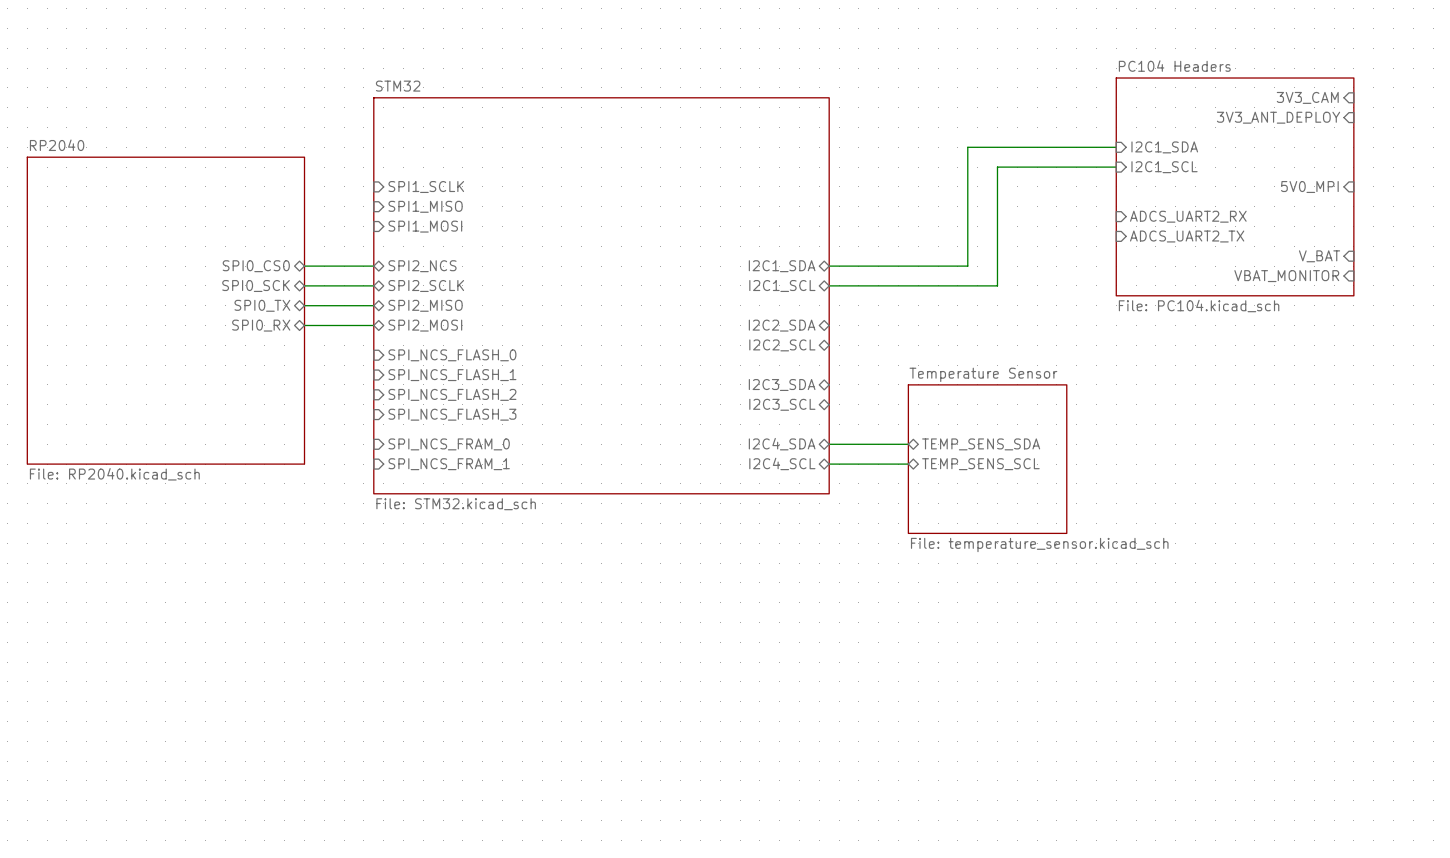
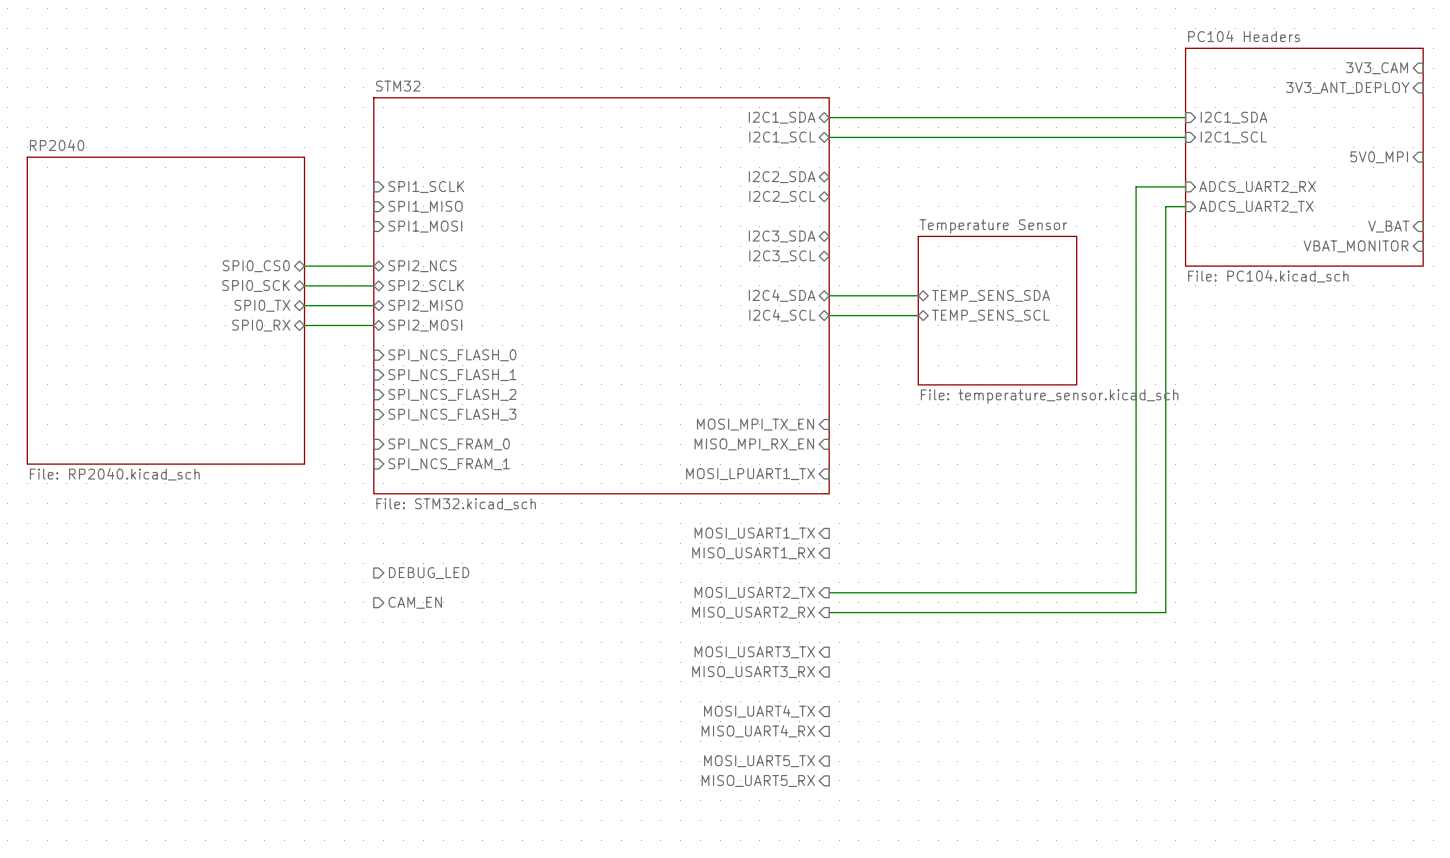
sheet pin position: 3V3_CAM (1307, 97) -> 3V3_CAM (1377, 68)
wire: none -> (829, 117) (1185, 117)
sheet pin position: 3V3_ANT_DEPLOY (1278, 117) -> 3V3_ANT_DEPLOY (1347, 88)
wire: none -> (829, 137) (1185, 137)
wire: (1116, 147) (967, 147) (967, 266) (829, 266) -> none
sheet pin position: I2C1_SDA (1164, 147) -> I2C1_SDA (1234, 117)
wire: (1116, 167) (997, 167) (997, 285) (829, 285) -> none
sheet pin position: I2C1_SCL (1164, 167) -> I2C1_SCL (1233, 137)
wire: none -> (1185, 186) (1136, 186) (1136, 592) (829, 592)
sheet PC104 Headers position: (1235, 186) -> (1304, 157)
sheet pin position: 5V0_MPI (1309, 187) -> 5V0_MPI (1379, 157)
wire: none -> (1185, 206) (1165, 206) (1165, 612) (829, 612)
sheet pin position: ADCS_UART2_RX (1188, 216) -> ADCS_UART2_RX (1257, 187)
sheet pin position: ADCS_UART2_TX (1187, 236) -> ADCS_UART2_TX (1256, 206)
sheet pin position: V_BAT (1319, 256) -> V_BAT (1388, 226)
sheet pin position: I2C1_SDA (782, 266) -> I2C1_SDA (782, 117)
sheet pin position: VBAT_MONITOR (1286, 276) -> VBAT_MONITOR (1356, 246)
sheet pin position: I2C1_SCL (782, 286) -> I2C1_SCL (782, 137)
sheet pin: none -> I2C4_SDA (782, 295)
wire: none -> (829, 295) (918, 295)
wire: none -> (829, 315) (918, 315)
sheet pin position: I2C2_SDA (782, 325) -> I2C2_SDA (782, 177)
sheet pin position: I2C2_SCL (782, 345) -> I2C2_SCL (782, 196)
sheet pin position: I2C3_SDA (782, 384) -> I2C3_SDA (782, 236)
sheet pin position: I2C3_SCL (782, 404) -> I2C3_SCL (782, 256)
sheet pin: none -> MOSI_MPI_TX_EN (755, 424)
sheet pin shape: bidirectional (782, 444) -> input (754, 444)
sheet pin: I2C4_SDA (782, 444) -> MISO_MPI_RX_EN (754, 444)
wire: (829, 444) (908, 444) -> none
sheet pin position: TEMP_SENS_SDA (981, 444) -> TEMP_SENS_SDA (991, 295)
sheet Temperature Sensor position: (987, 459) -> (997, 310)
sheet pin position: I2C4_SCL (782, 463) -> I2C4_SCL (782, 315)
wire: (829, 464) (908, 464) -> none
sheet pin position: TEMP_SENS_SCL (980, 464) -> TEMP_SENS_SCL (990, 315)
sheet pin: none -> MOSI_LPUART1_TX (750, 474)
sheet pin: none -> MOSI_USART1_TX (754, 533)
sheet pin: none -> MISO_USART1_RX (753, 553)
sheet pin: none -> DEBUG_LED (429, 573)
sheet pin: none -> MOSI_USART2_TX (754, 592)
sheet pin: none -> CAM_EN (415, 602)
sheet pin: none -> MISO_USART2_RX (753, 612)
sheet pin: none -> MOSI_USART3_TX (754, 652)
sheet pin: none -> MISO_USART3_RX (753, 672)
sheet pin: none -> MOSI_UART4_TX (759, 711)
sheet pin: none -> MISO_UART4_RX (758, 731)
sheet pin: none -> MOSI_UART5_TX (759, 761)
sheet pin: none -> MISO_UART5_RX (758, 780)

